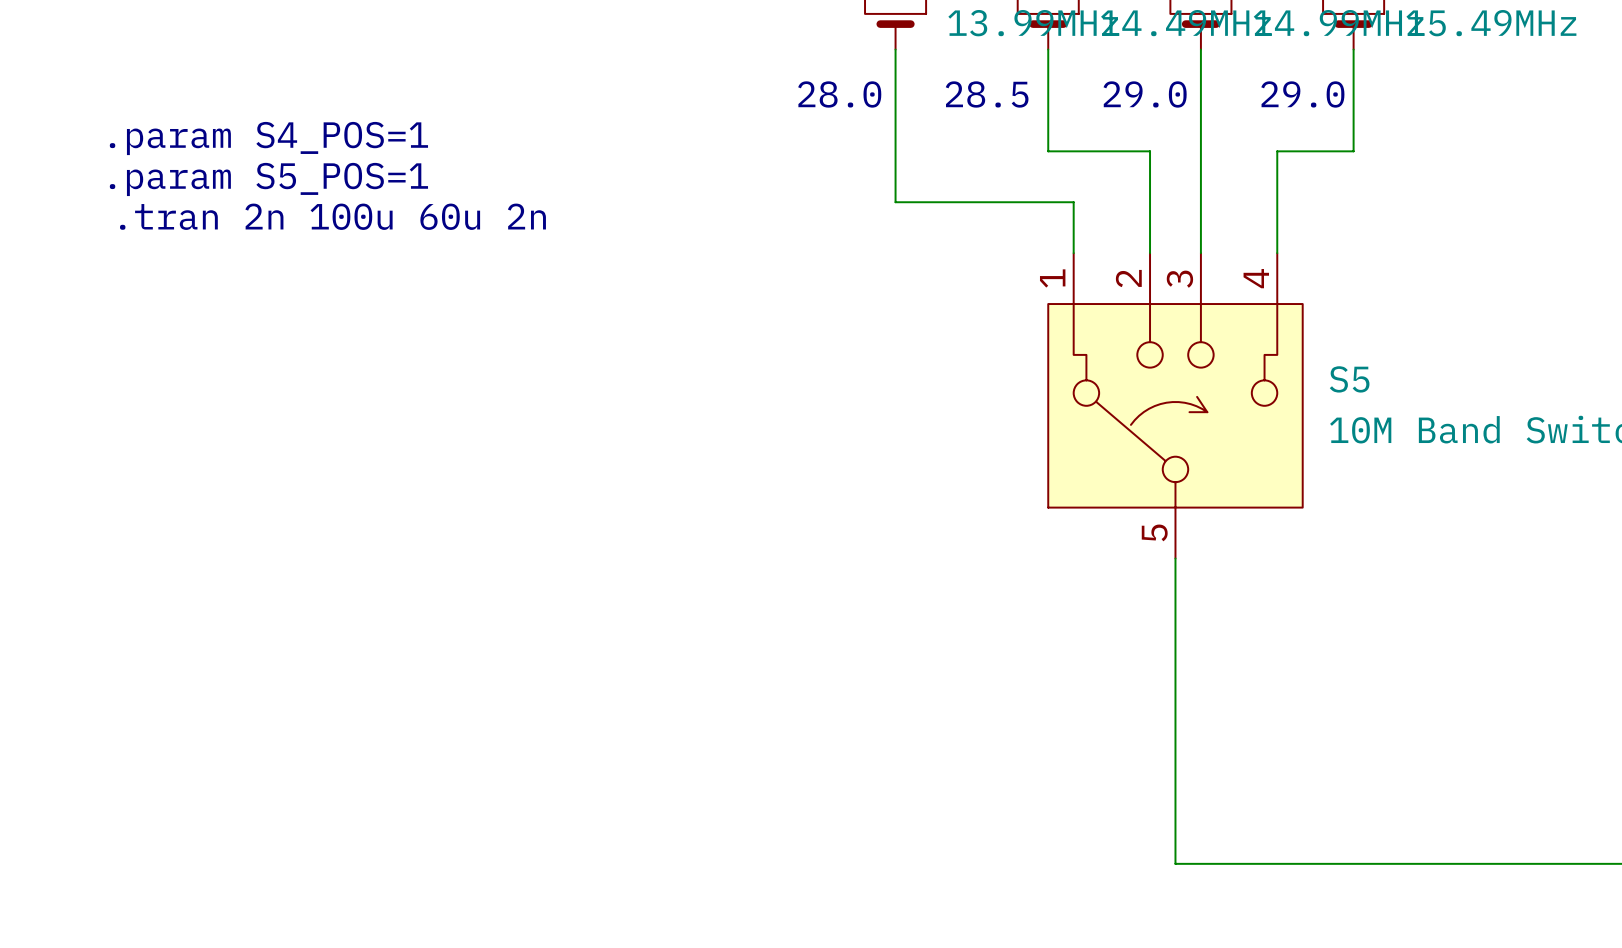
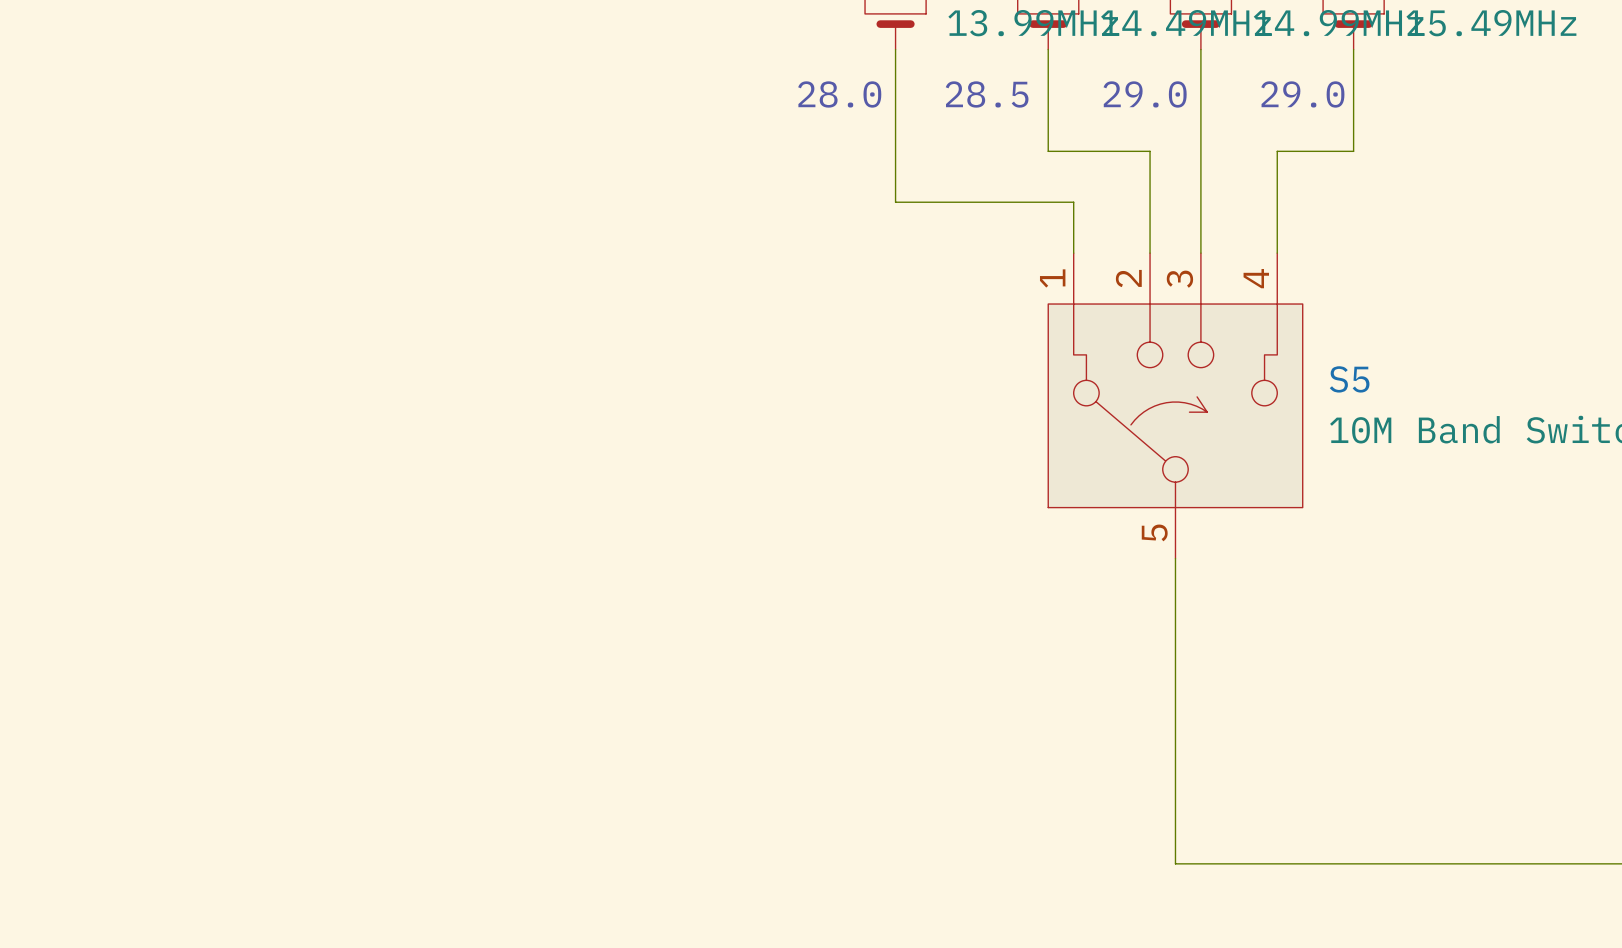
text: .param S4_POS=1 (268, 138) -> none
text: .param S5_POS=1 (268, 179) -> none
text: .tran 2n 100u 60u 2n (332, 216) -> none

